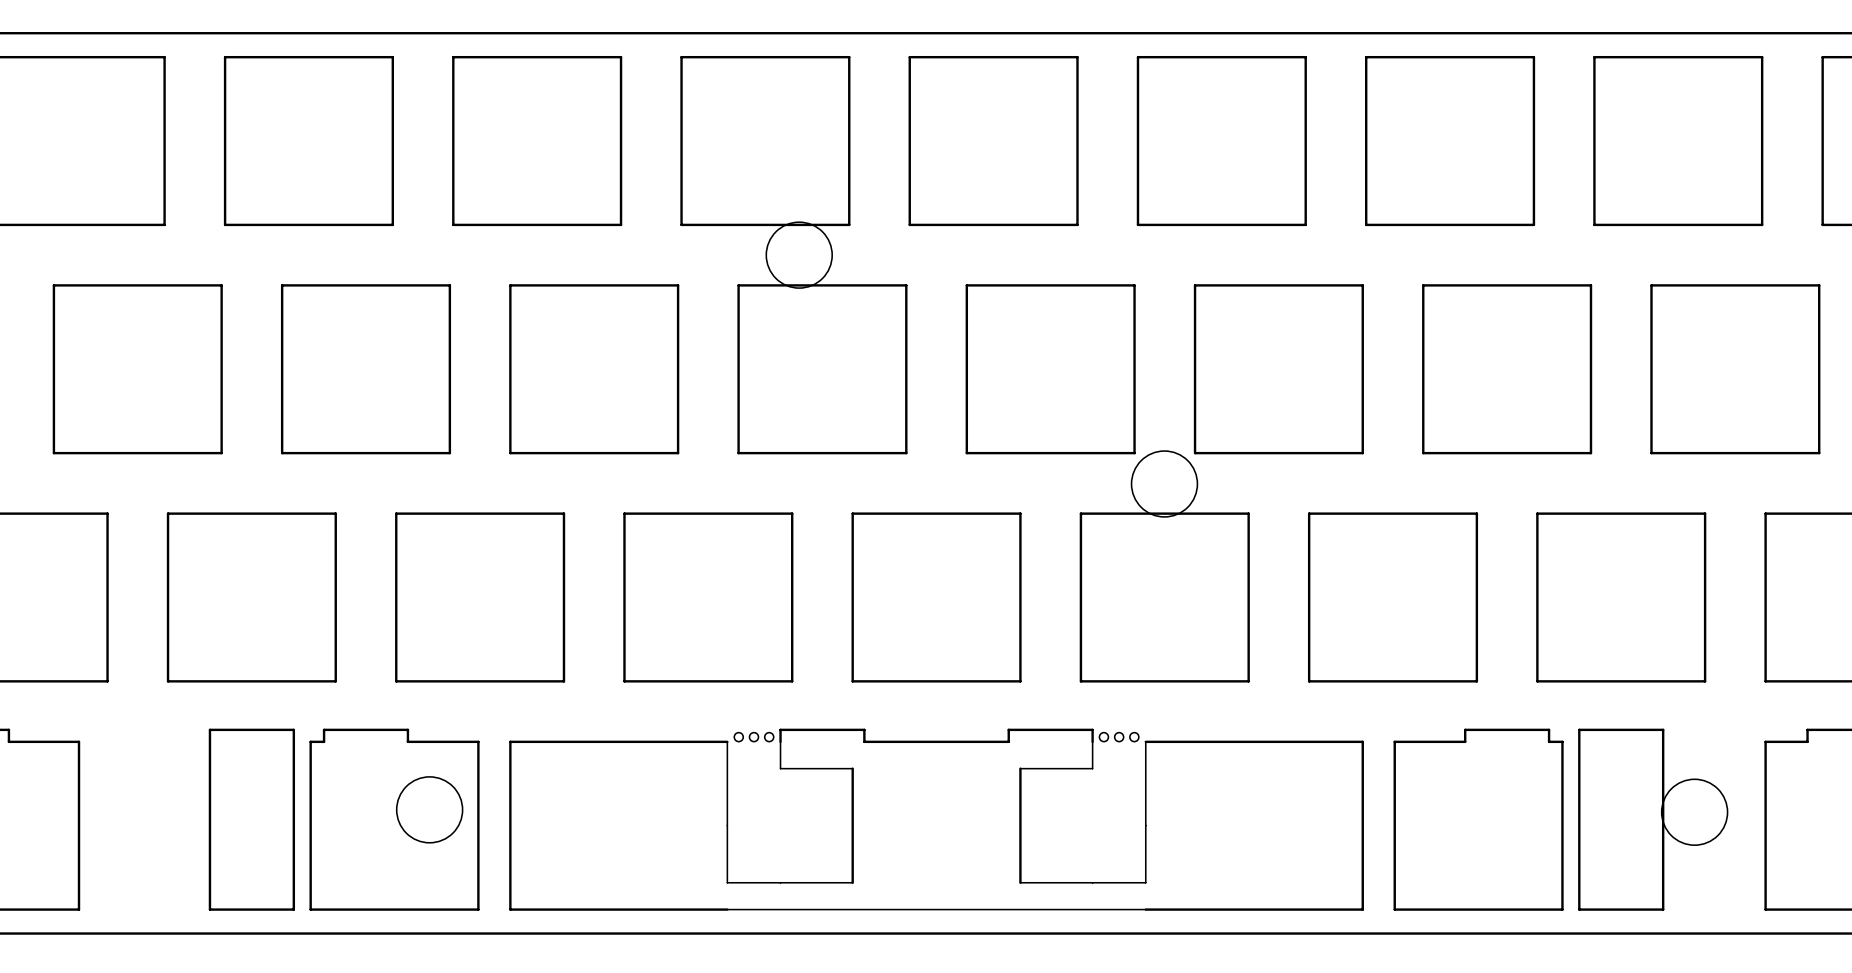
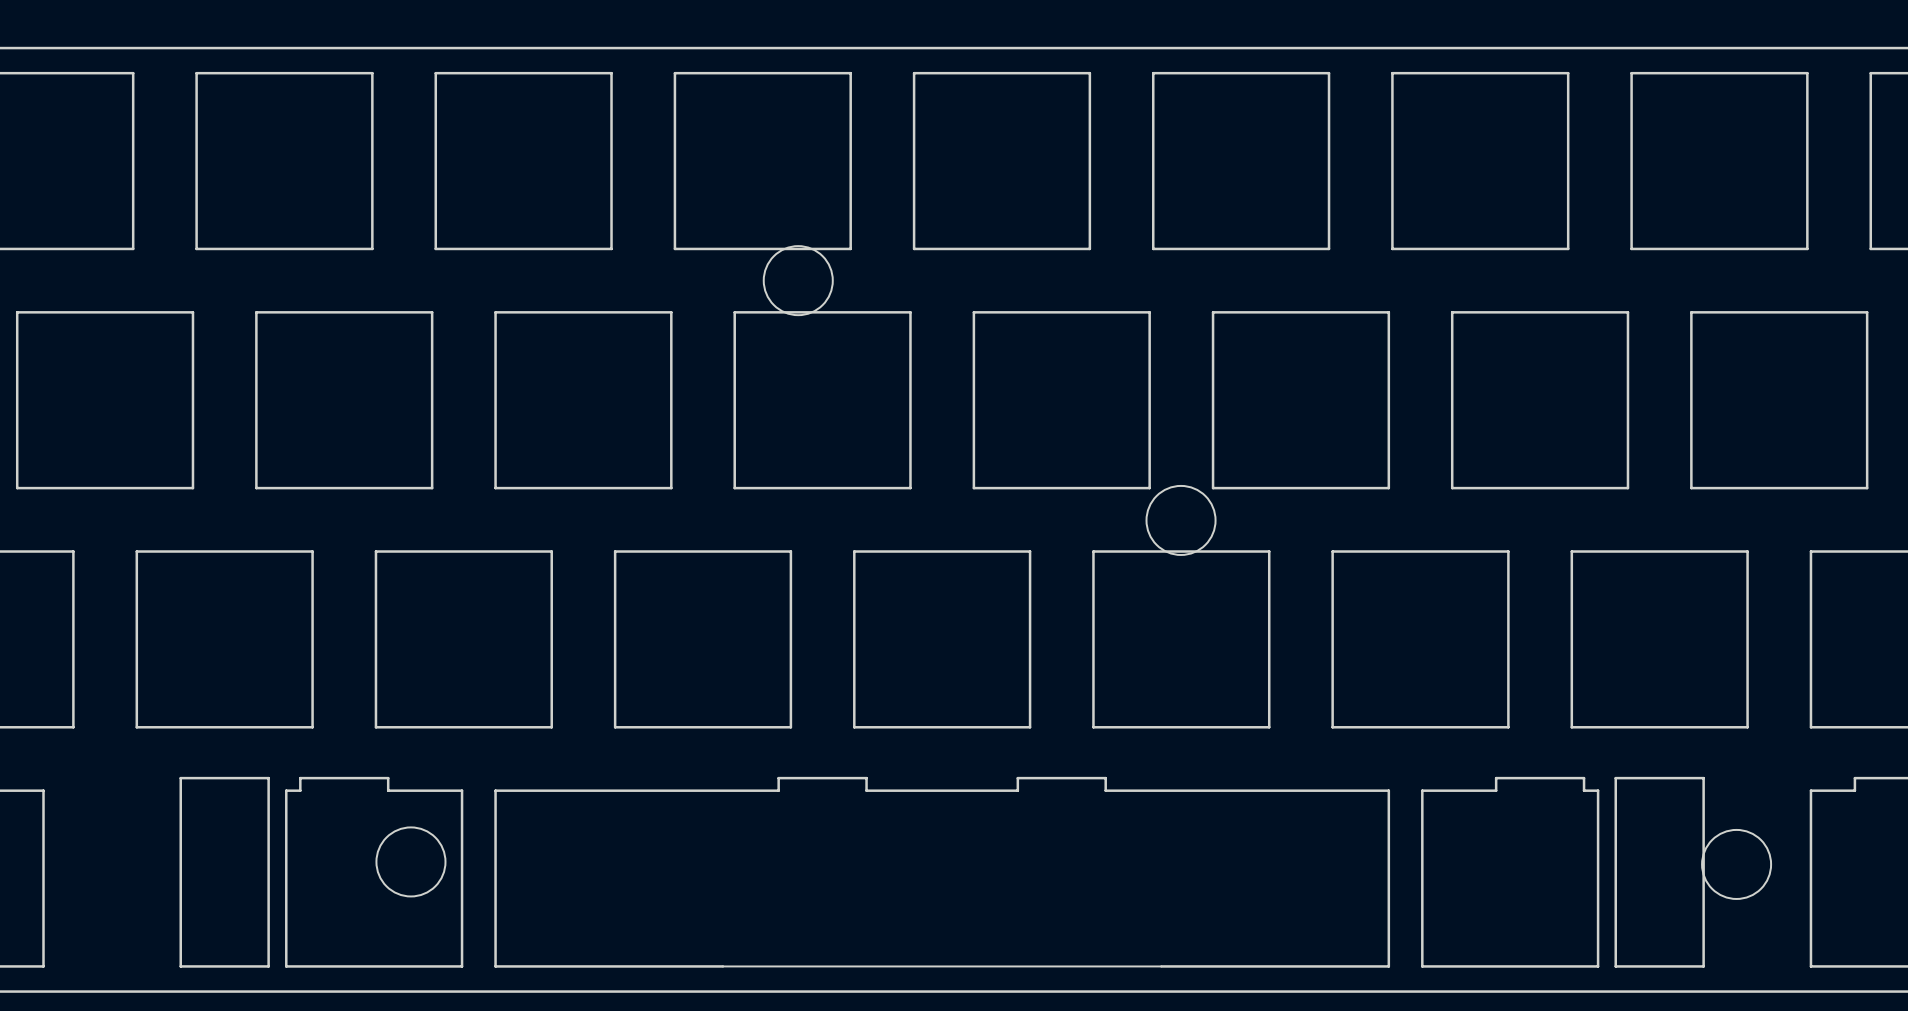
part: (753, 737) -> none
part: (1119, 737) -> none
board edge: (727, 741) (727, 882) (852, 882) (852, 768) (780, 768) (780, 741) -> (722, 790) (778, 790)
board edge: (1092, 741) (1092, 768) (1020, 768) (1020, 882) (1145, 882) (1145, 741) -> (1105, 790) (1161, 790)

